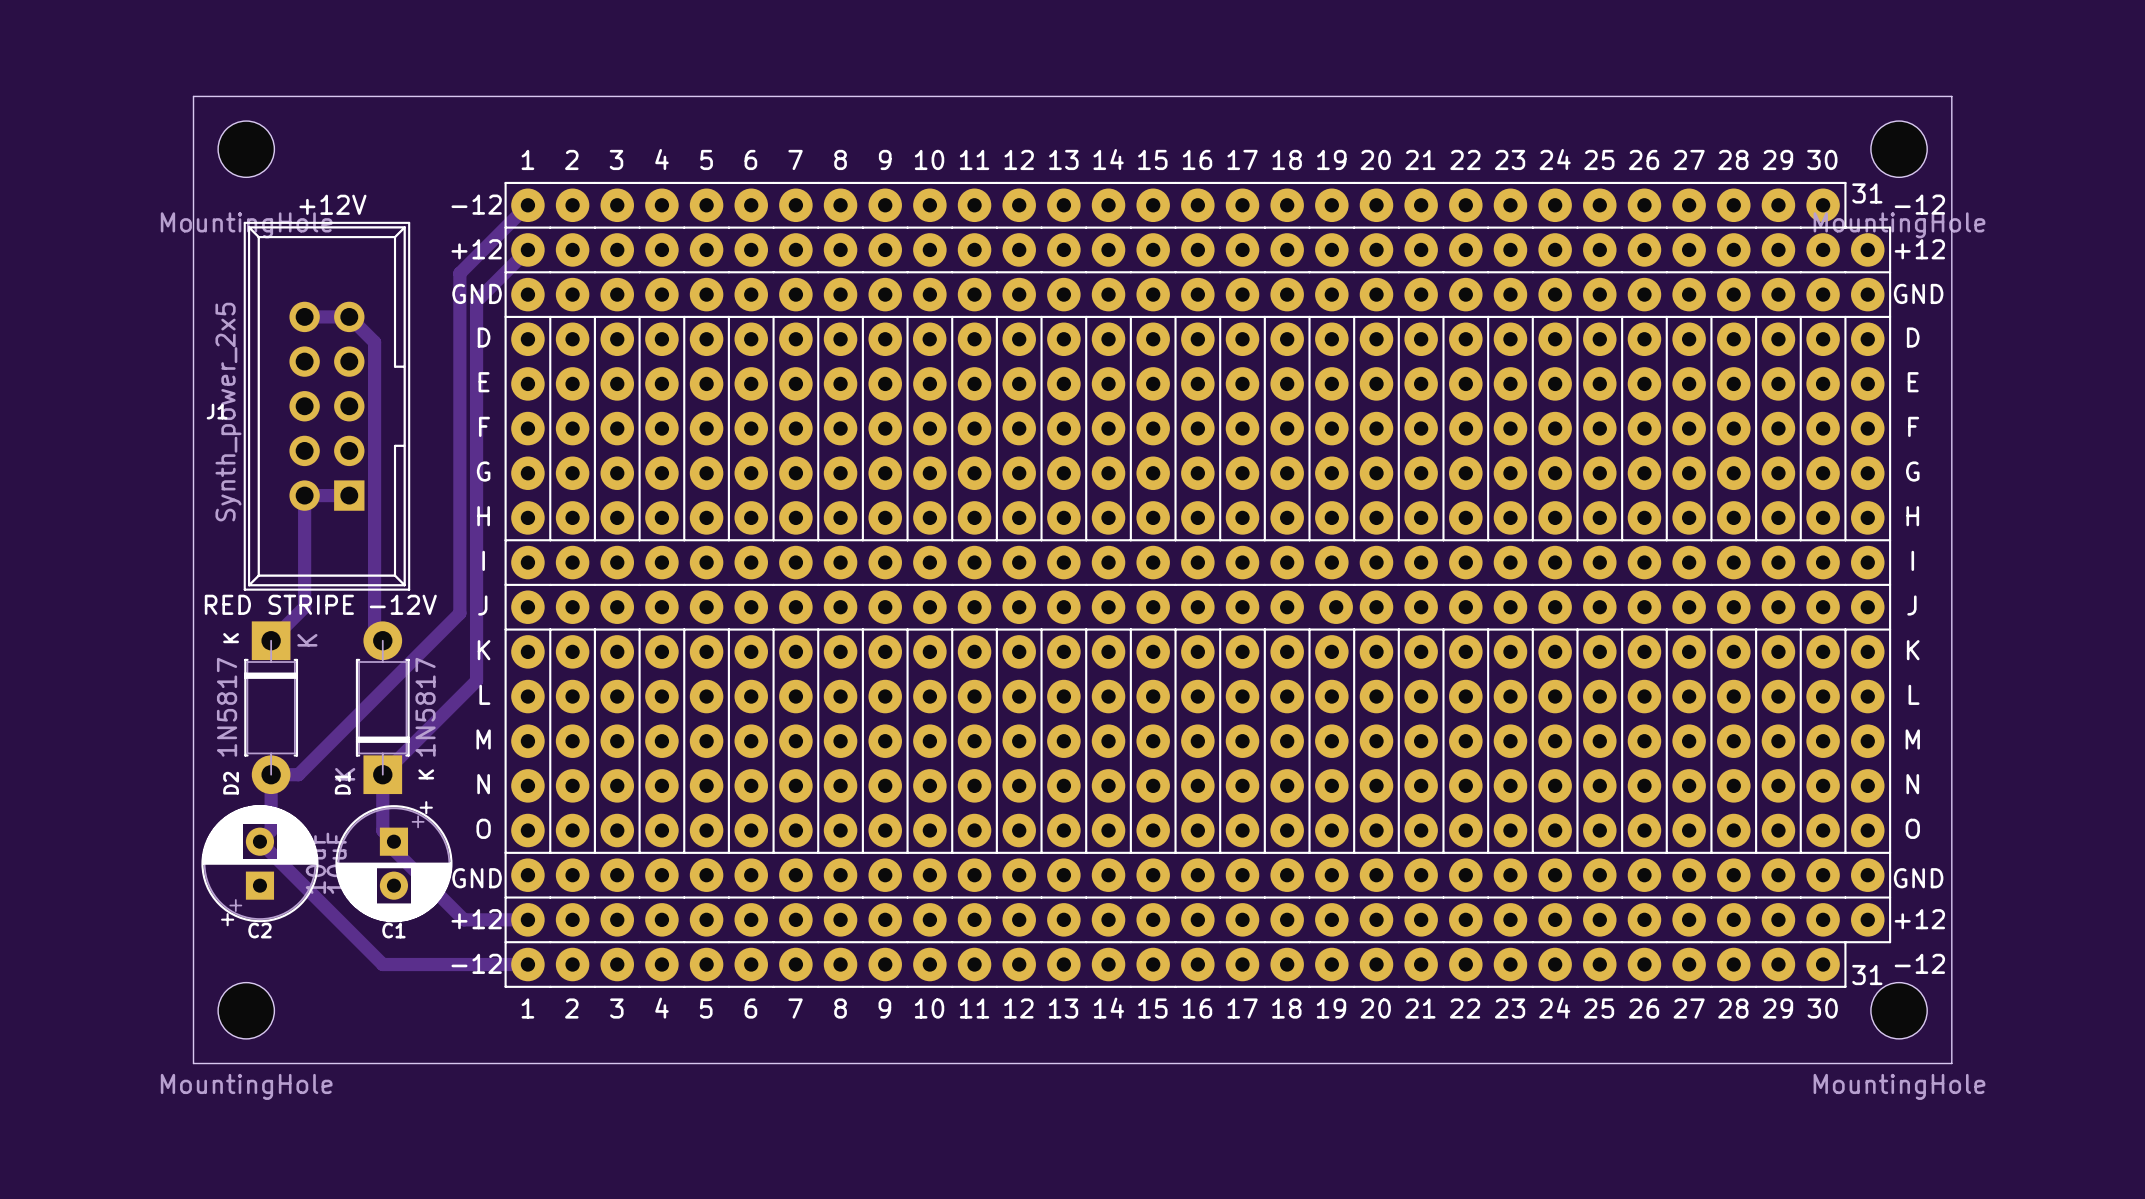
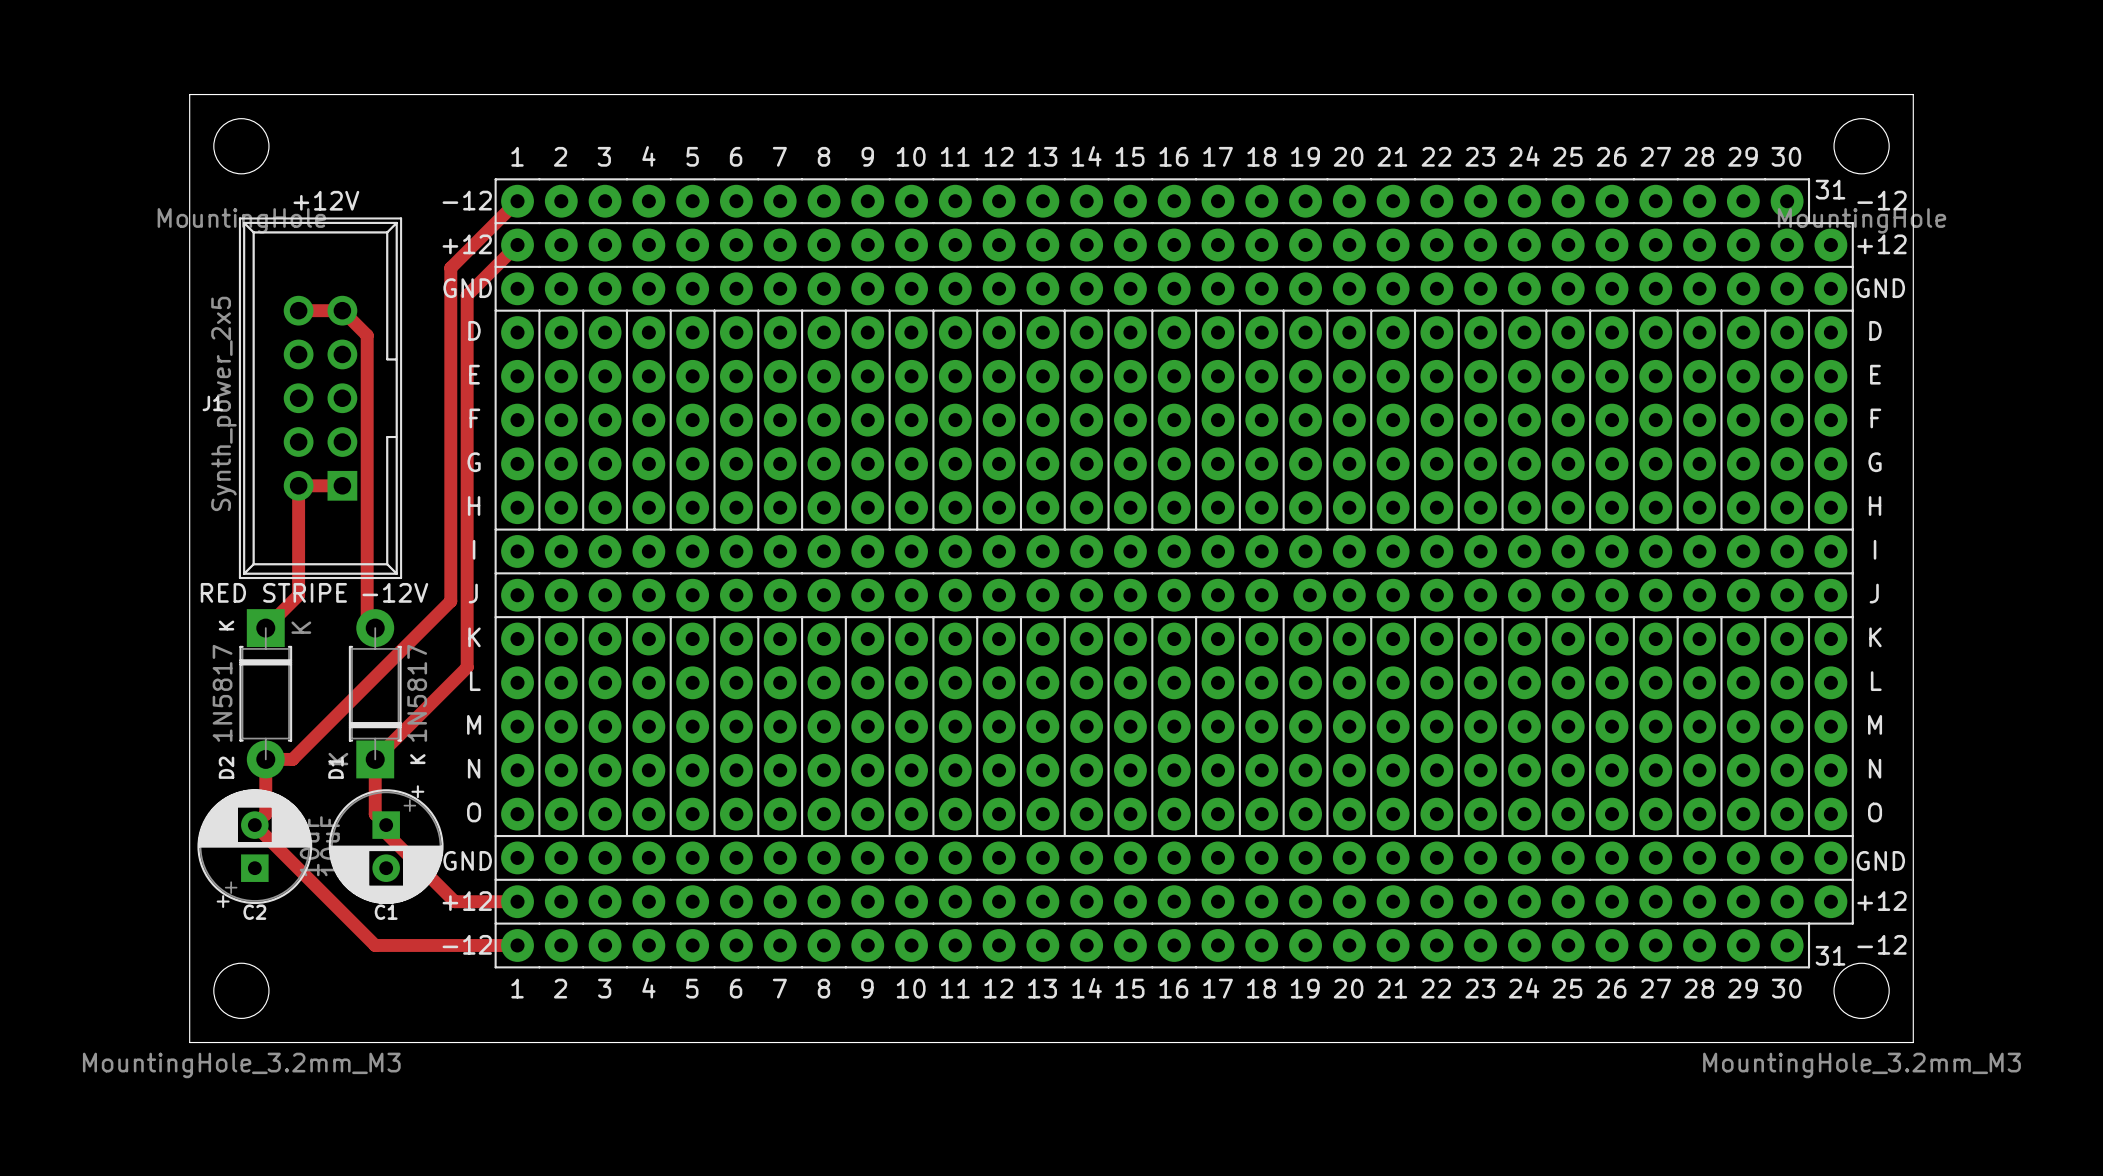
part value: MountingHole (246, 1086) -> MountingHole_3.2mm_M3 (241, 1065)
part value: MountingHole (1899, 1086) -> MountingHole_3.2mm_M3 (1862, 1065)

